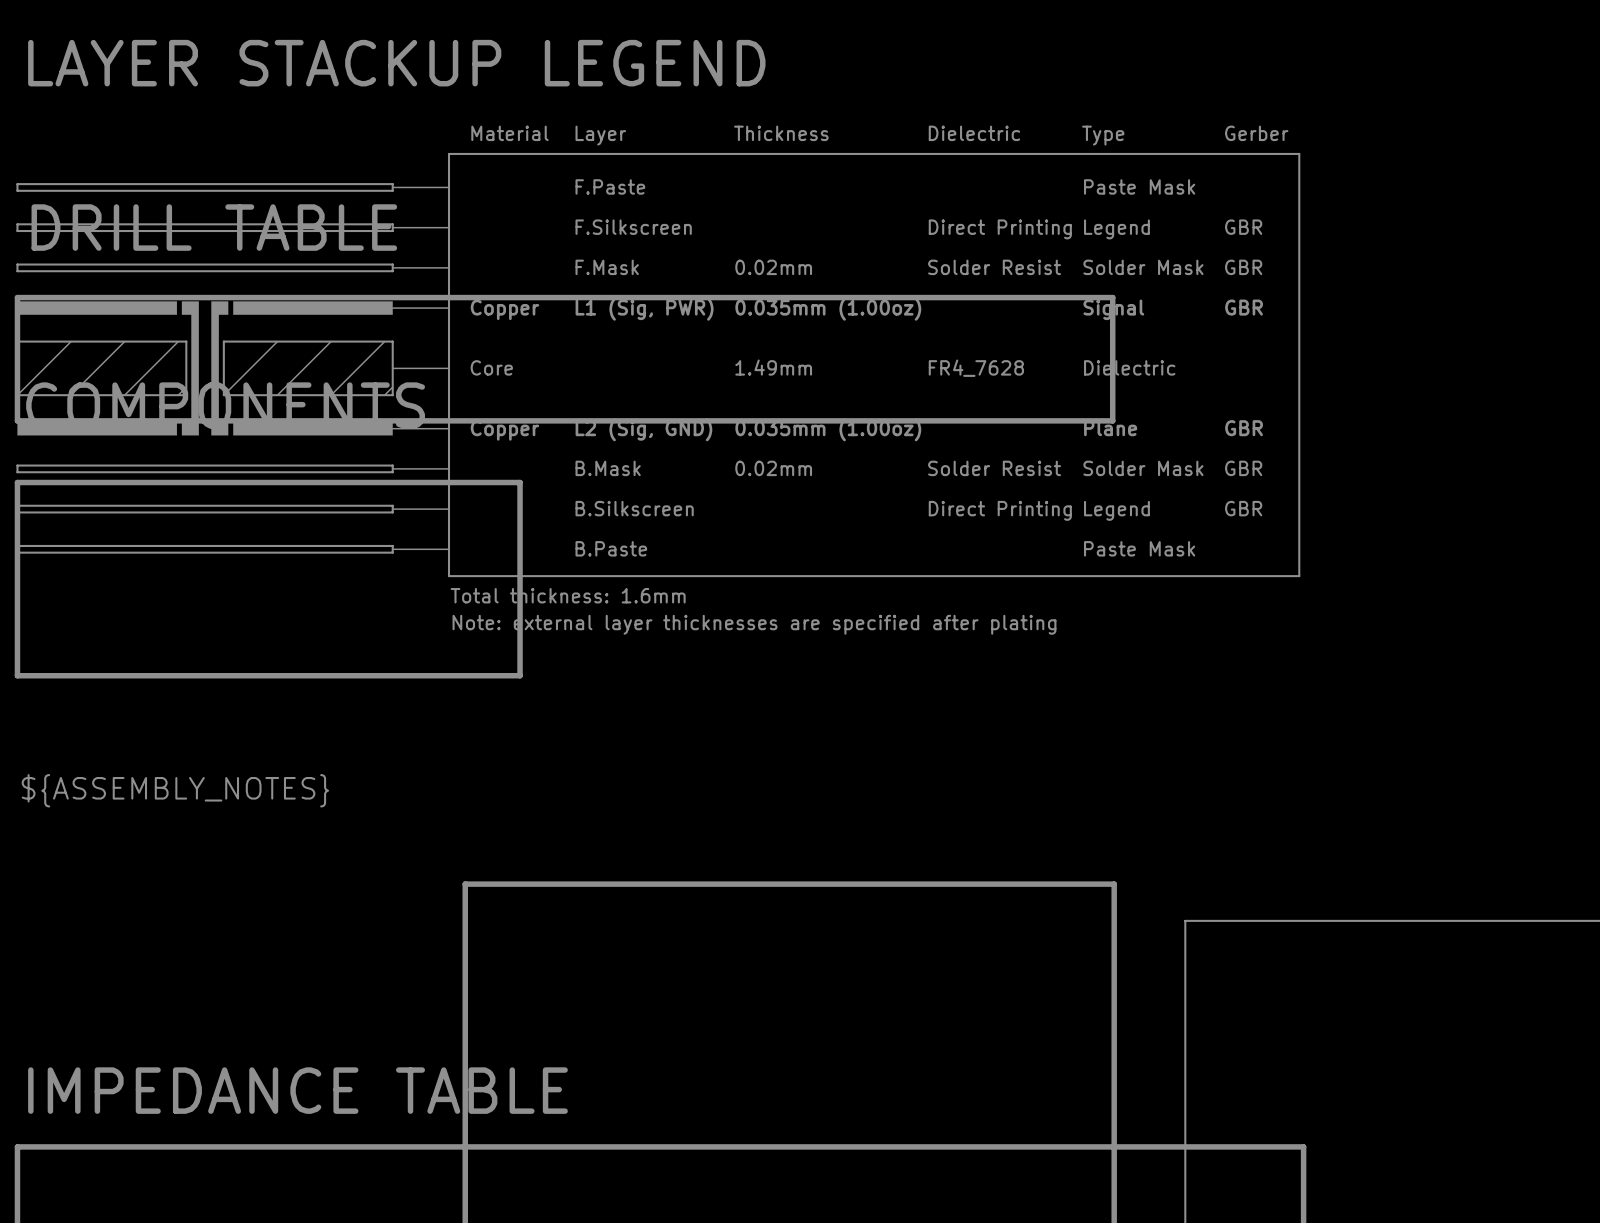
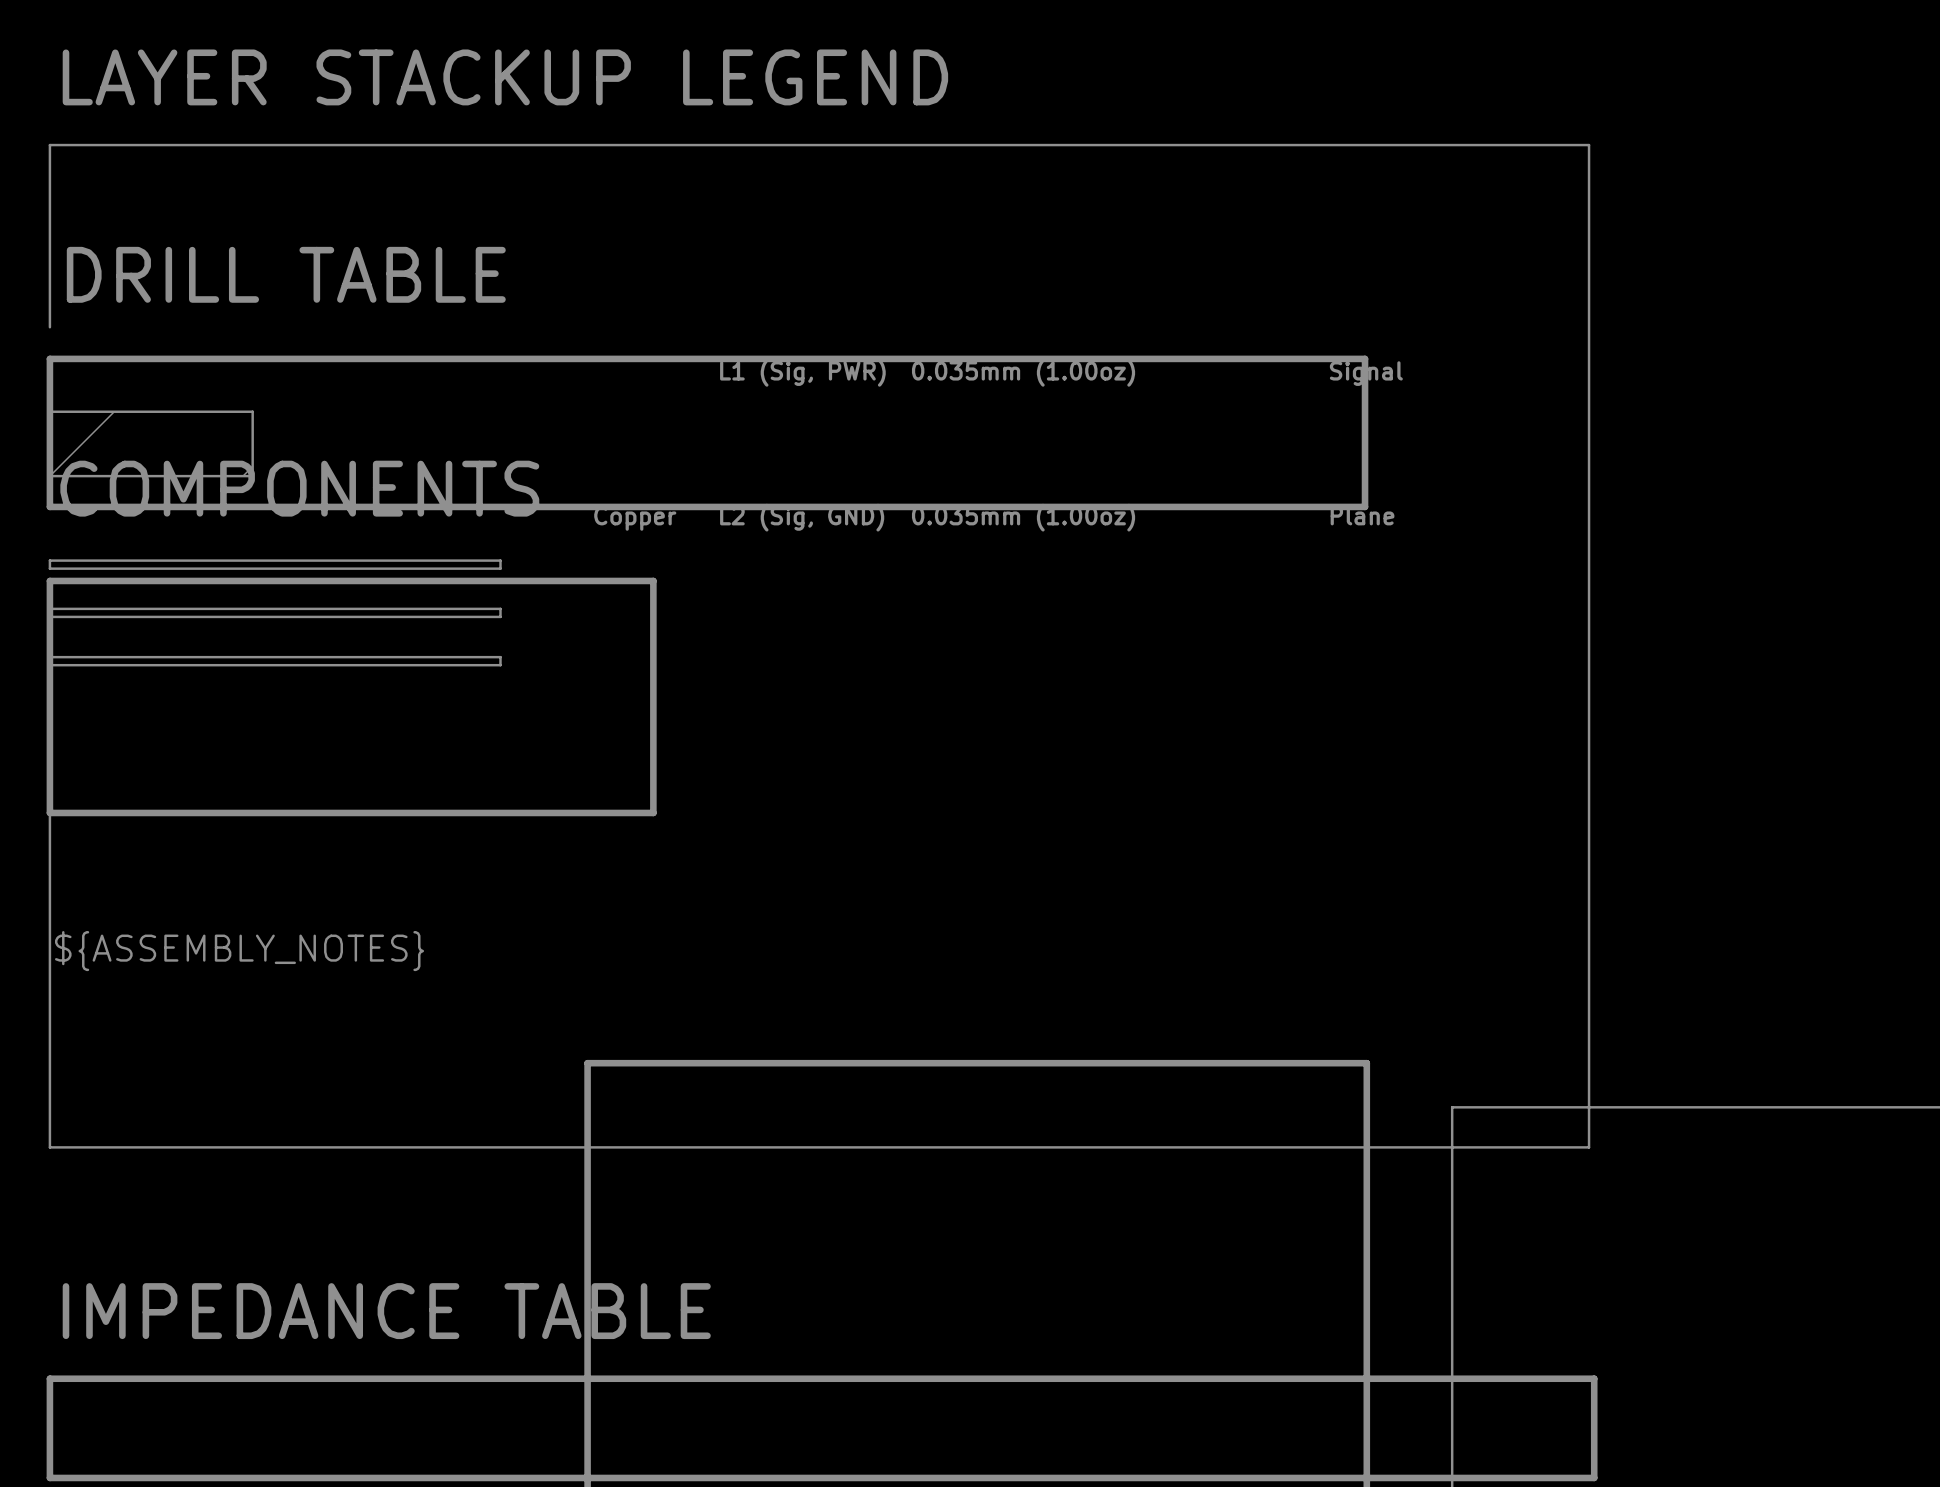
text: Material (509, 133) -> none
text: Thickness (781, 133) -> none
text: Dielectric (974, 133) -> none
text: Gerber (1256, 133) -> none
text: Layer (600, 135) -> none
text: Type (1103, 135) -> none
line: (1299, 153) (449, 153) (449, 576) (1299, 576) -> (49, 665) (49, 1147) (1589, 1147) (1589, 693)
line: (17, 184) (392, 184) (392, 190) (17, 190) -> (49, 222) (49, 145) (1589, 145) (1589, 186)
text: F.Paste (610, 186) -> none
text: Paste Mask (1139, 186) -> none
line: (392, 187) (449, 187) -> none
line: (17, 224) (392, 224) (392, 231) (17, 231) -> (49, 270) (49, 230)
line: (392, 227) (449, 227) -> none
text: F.Silkscreen (633, 227) -> none
text: GBR (1243, 227) -> none
text: Direct Printing (1000, 229) -> none
text: Legend (1116, 229) -> none
line: (17, 264) (392, 264) (392, 271) (17, 271) -> (49, 319) (49, 278)
line: (392, 267) (449, 267) -> none
text: F.Mask (607, 267) -> none
text: 0.02mm (773, 267) -> none
text: Solder Resist (994, 267) -> none
text: Solder Mask (1143, 267) -> none
text: GBR (1243, 267) -> none
drawing: [17, 301, 393, 436] -> none
text: GBR (1244, 307) -> none
line: (392, 308) (449, 308) -> none
text: Copper (504, 309) -> none
line: (124, 341) (71, 395) -> none
line: (178, 341) (124, 395) -> none
line: (277, 341) (223, 395) -> none
line: (331, 341) (277, 395) -> none
line: (384, 341) (331, 395) -> none
text: Core (491, 367) -> none
text: 1.49mm (773, 367) -> none
text: Dielectric (1129, 367) -> none
line: (392, 368) (449, 368) -> none
text: FR4_7628 (976, 368) -> none
line: (392, 387) (384, 395) -> none
line: (223, 395) (392, 395) (392, 341) (223, 341) (223, 395) -> none
line: (392, 428) (449, 428) -> none
text: GBR (1244, 428) -> none
line: (392, 468) (449, 468) -> none
text: B.Mask (608, 468) -> none
text: 0.02mm (773, 468) -> none
text: Solder Resist (994, 468) -> none
text: Solder Mask (1143, 468) -> none
text: GBR (1243, 468) -> none
text: B.Silkscreen (634, 508) -> none
text: GBR (1243, 508) -> none
line: (392, 509) (449, 509) -> none
text: Direct Printing (1000, 510) -> none
text: Legend (1116, 510) -> none
text: B.Paste (611, 548) -> none
text: Paste Mask (1139, 548) -> none
line: (392, 549) (449, 549) -> none
text: Total thickness: 1.6mm (568, 595) -> none
text: Note: external layer thicknesses are specified after plating (754, 624) -> none

